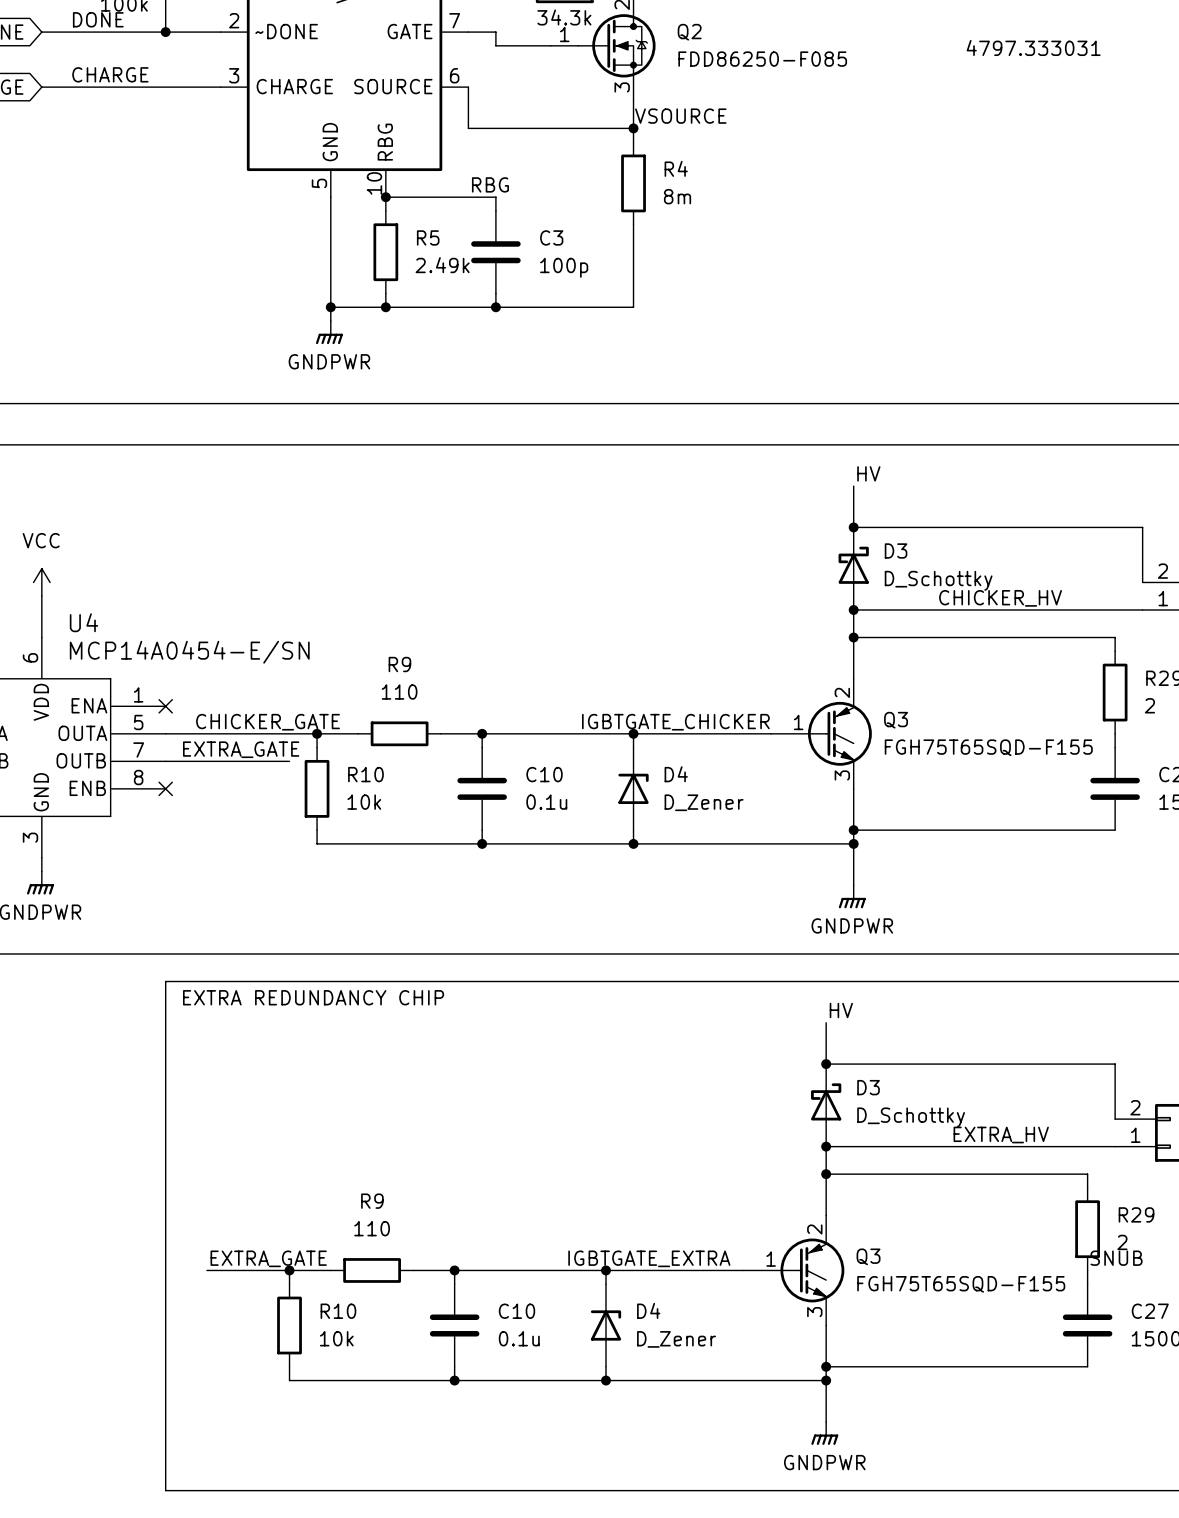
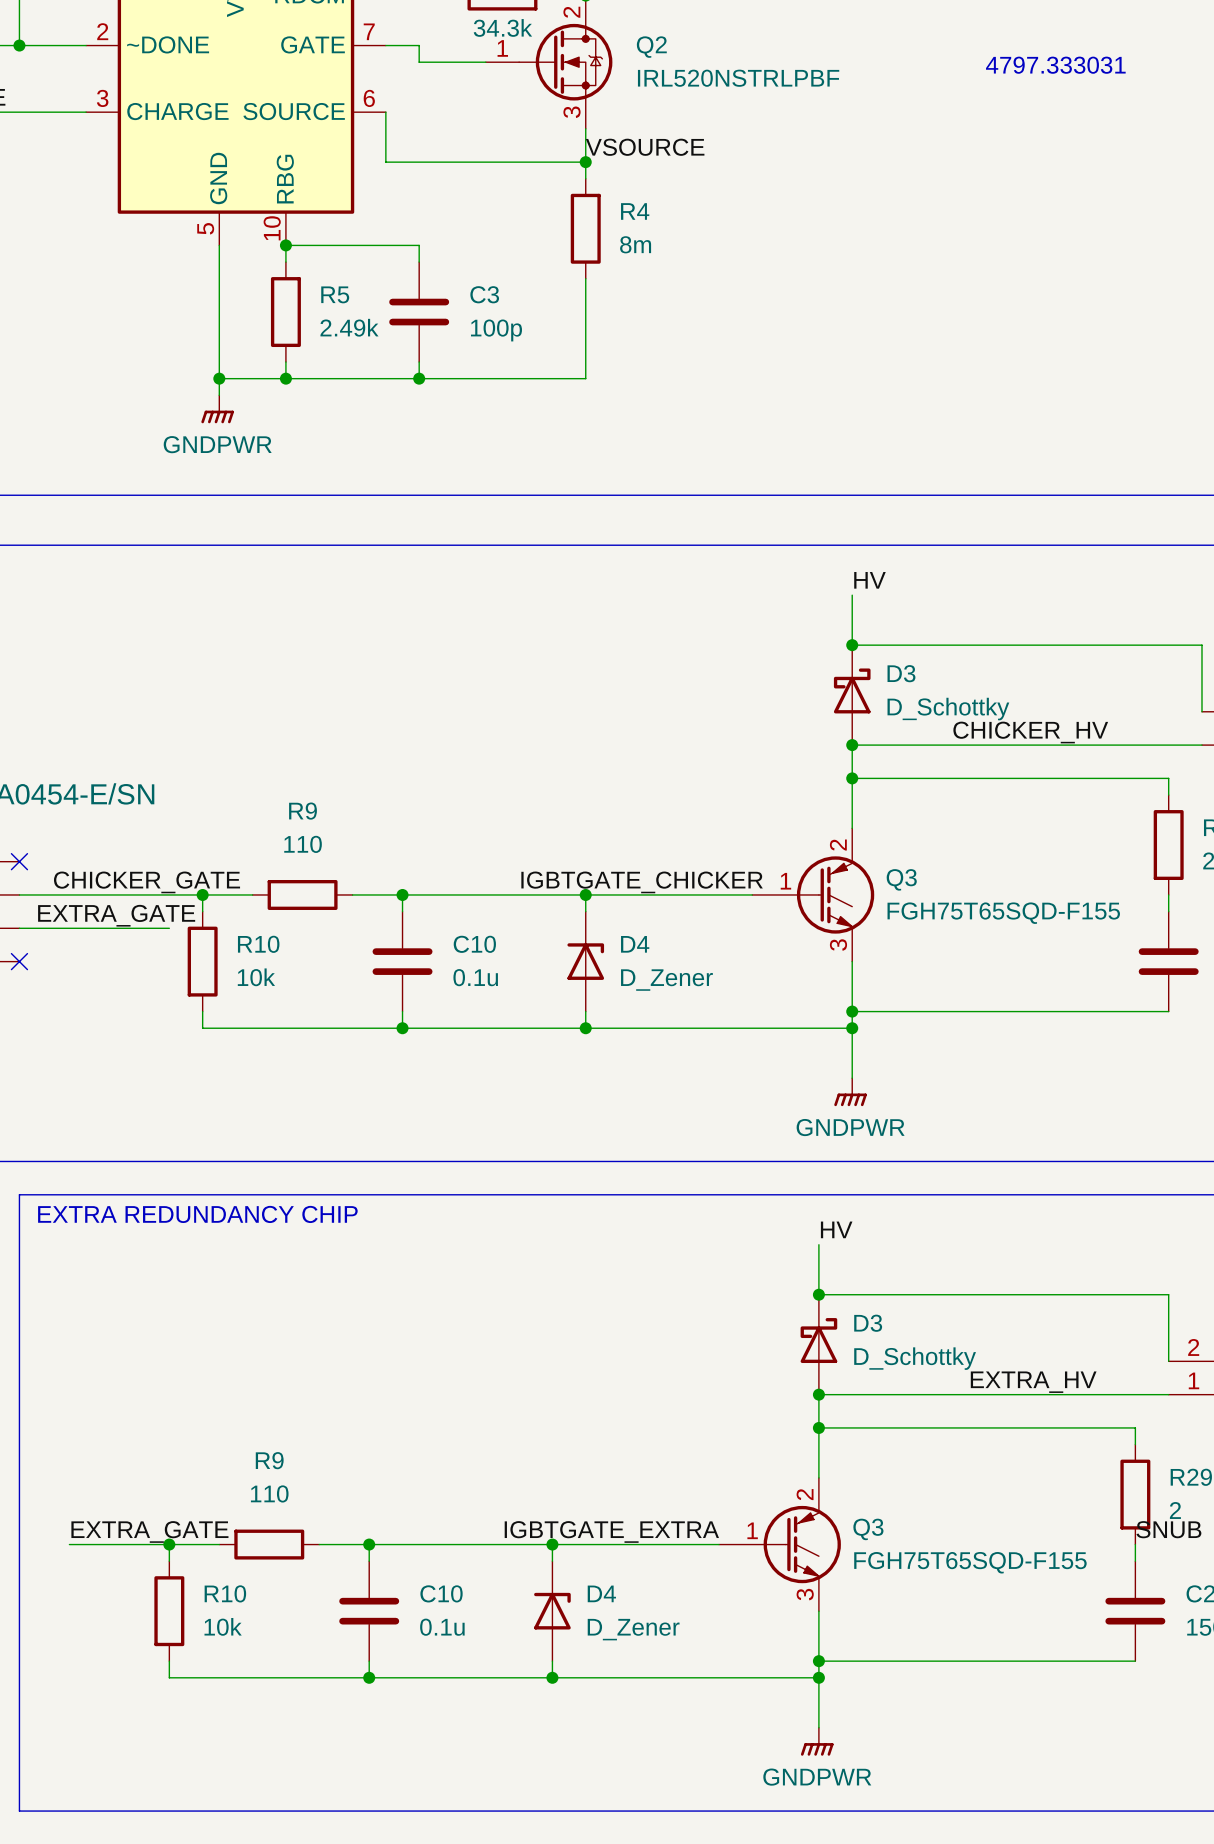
Q2 value: FDD86250-F085 (762, 59) -> IRL520NSTRLPBF (738, 78)
label: RBG (490, 184) -> none

